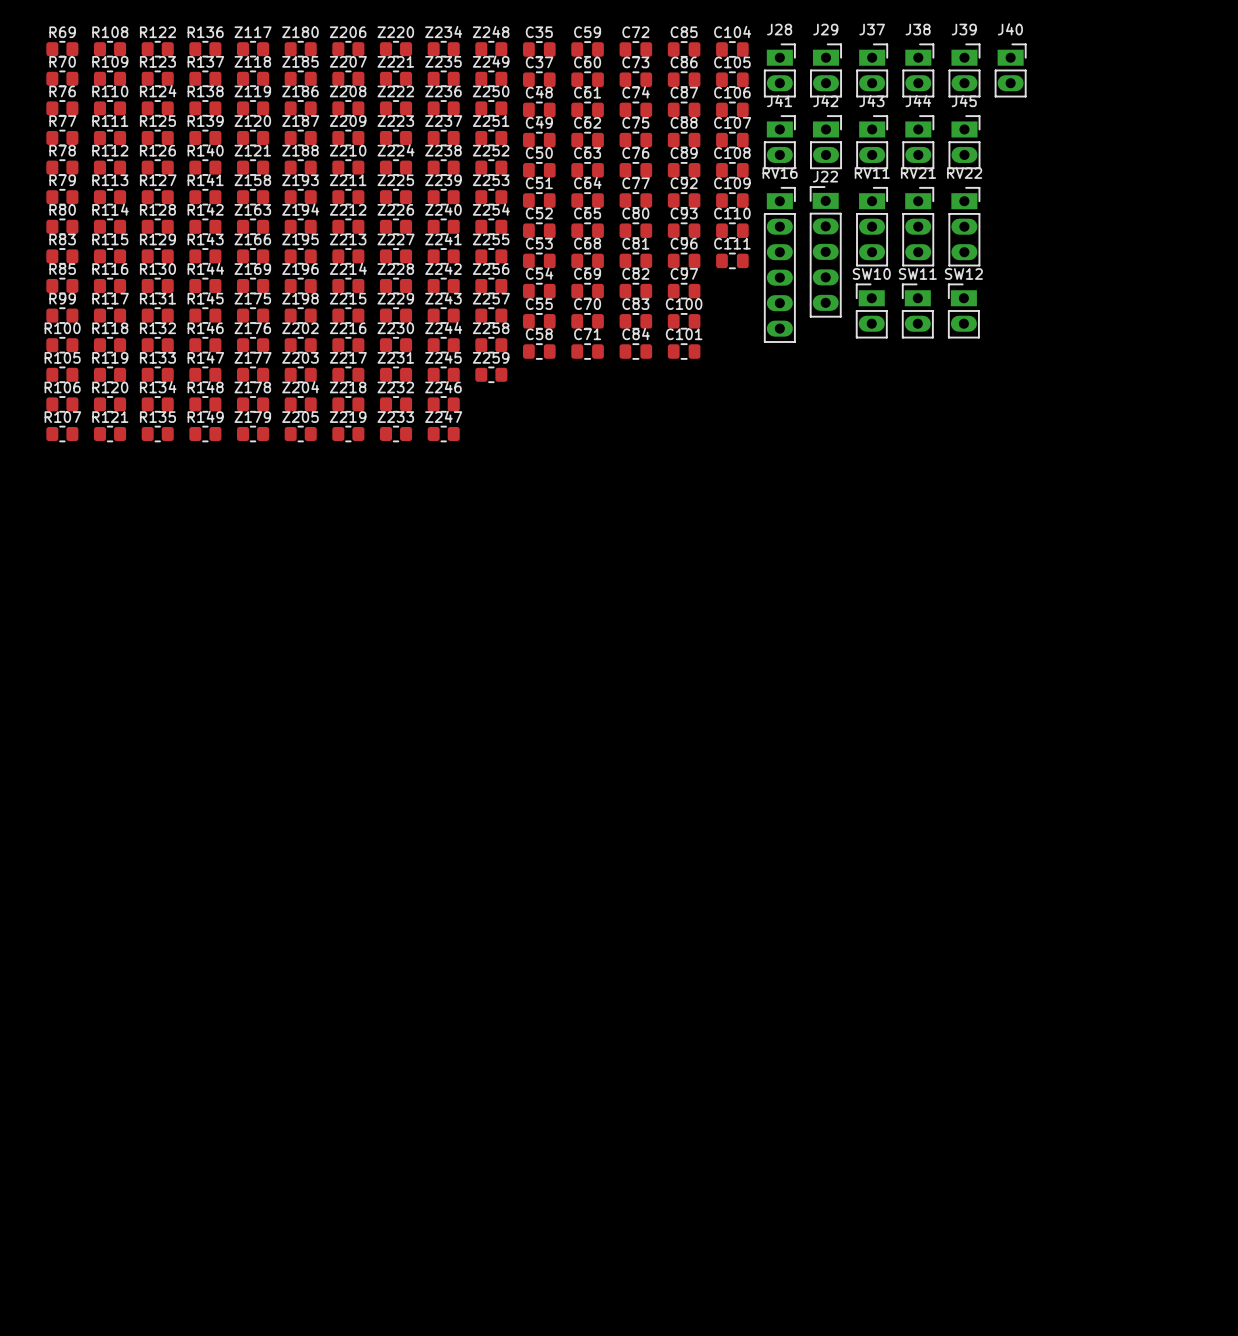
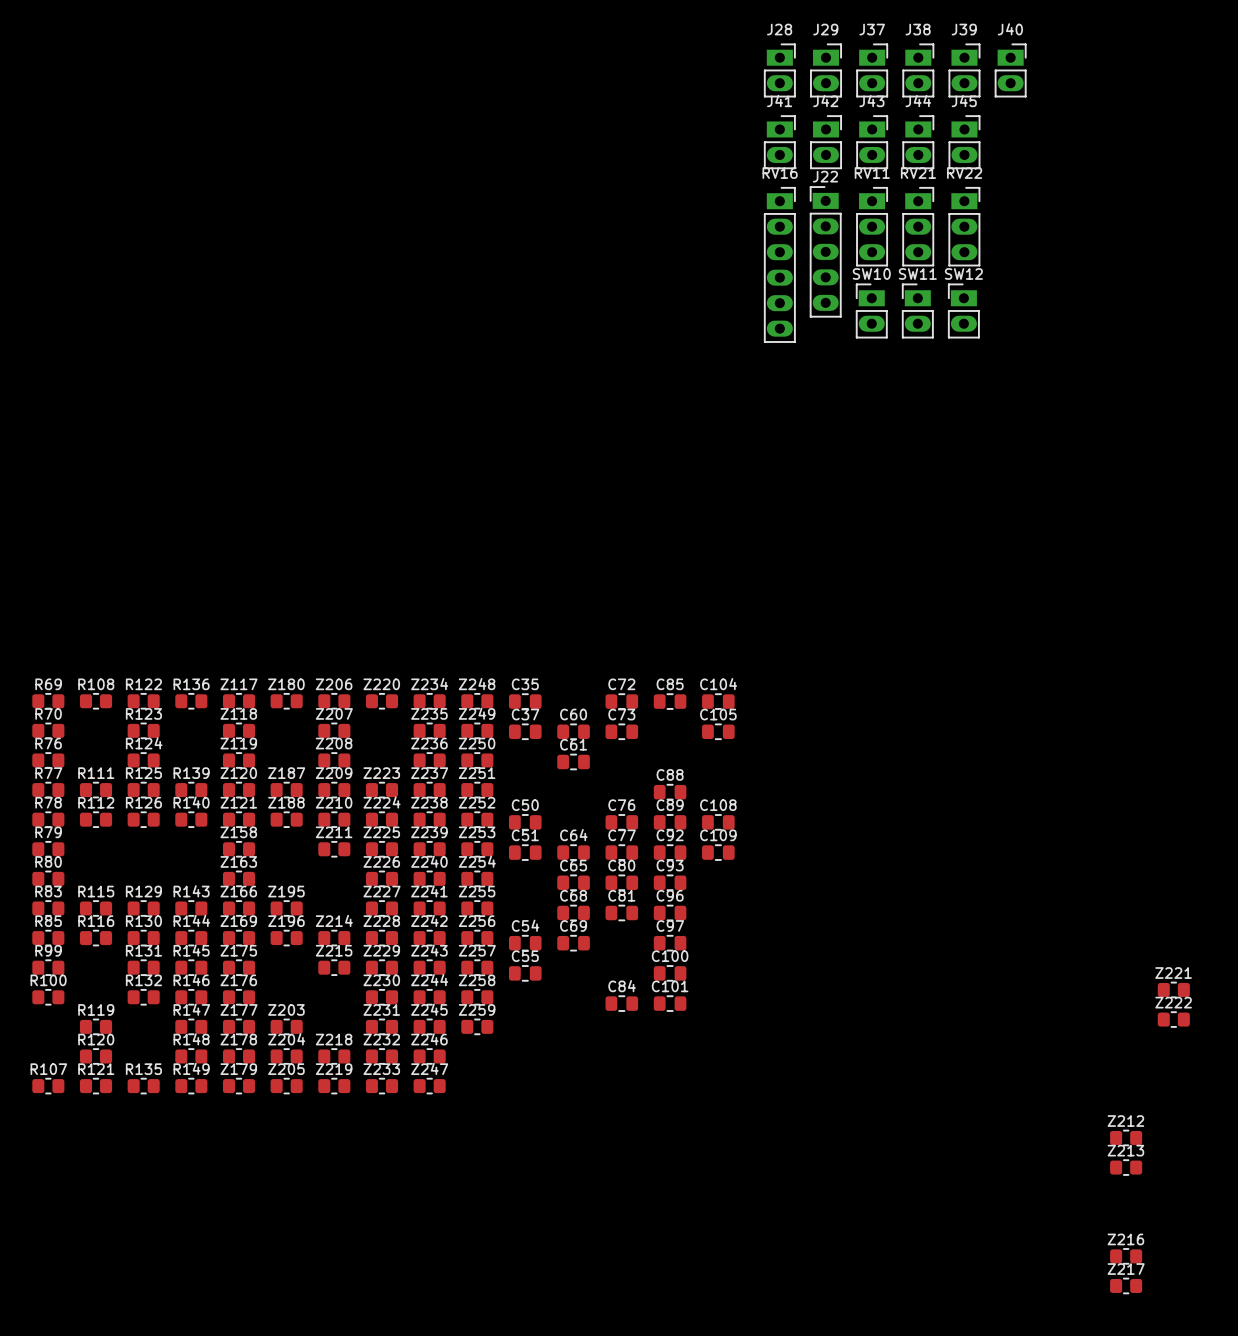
R69 position: (62, 49) -> (48, 701)
R108 position: (110, 49) -> (96, 701)
R122 position: (157, 49) -> (143, 701)
R136 position: (205, 49) -> (191, 701)
Z117 position: (253, 49) -> (239, 701)
Z180 position: (300, 49) -> (286, 701)
Z206 position: (348, 49) -> (334, 701)
Z220 position: (396, 49) -> (381, 701)
Z234 position: (443, 49) -> (429, 701)
Z248 position: (491, 49) -> (477, 701)
C35 position: (539, 49) -> (525, 701)
C59: (587, 49) -> none
C72 position: (635, 49) -> (621, 701)
C85 position: (684, 49) -> (670, 701)
C104 position: (732, 49) -> (718, 701)
R70 position: (62, 78) -> (48, 730)
R109: (110, 78) -> none
R123 position: (157, 78) -> (143, 730)
R137: (205, 78) -> none
Z118 position: (253, 78) -> (239, 730)
Z185: (300, 78) -> none
Z207 position: (348, 78) -> (334, 730)
Z221 position: (396, 78) -> (1173, 989)
Z235 position: (443, 78) -> (429, 730)
Z249 position: (491, 78) -> (477, 730)
C37 position: (539, 79) -> (525, 731)
C60 position: (587, 79) -> (573, 731)
C73 position: (635, 79) -> (621, 731)
C86: (684, 79) -> none
C105 position: (732, 79) -> (718, 731)
R76 position: (62, 108) -> (48, 760)
R110: (110, 108) -> none
R124 position: (157, 108) -> (143, 760)
R138: (205, 108) -> none
Z119 position: (253, 108) -> (239, 760)
Z186: (300, 108) -> none
Z208 position: (348, 108) -> (334, 760)
Z222 position: (396, 108) -> (1173, 1019)
Z236 position: (443, 108) -> (429, 760)
Z250 position: (491, 108) -> (477, 760)
C48: (539, 109) -> none
C61 position: (587, 109) -> (573, 761)
C74: (635, 109) -> none
C87: (684, 109) -> none
C106: (732, 109) -> none
R77 position: (62, 137) -> (48, 790)
R111 position: (110, 137) -> (96, 790)
R125 position: (157, 137) -> (143, 790)
R139 position: (205, 137) -> (191, 790)
Z120 position: (253, 137) -> (239, 790)
Z187 position: (300, 137) -> (286, 790)
Z209 position: (348, 137) -> (334, 790)
Z223 position: (396, 137) -> (381, 790)
Z237 position: (443, 137) -> (429, 790)
Z251 position: (491, 137) -> (477, 790)
C49: (539, 140) -> none
C62: (587, 140) -> none
C75: (635, 140) -> none
C88 position: (684, 140) -> (670, 792)
C107: (732, 140) -> none
R78 position: (62, 167) -> (48, 819)
R112 position: (110, 167) -> (96, 819)
R126 position: (157, 167) -> (143, 819)
R140 position: (205, 167) -> (191, 819)
Z121 position: (253, 167) -> (239, 819)
Z188 position: (300, 167) -> (286, 819)
Z210 position: (348, 167) -> (334, 819)
Z224 position: (396, 167) -> (381, 819)
Z238 position: (443, 167) -> (429, 819)
Z252 position: (491, 167) -> (477, 819)
C50 position: (539, 170) -> (525, 822)
C63: (587, 170) -> none
C76 position: (635, 170) -> (621, 822)
C89 position: (684, 170) -> (670, 822)
C108 position: (732, 170) -> (718, 822)
R79 position: (62, 197) -> (48, 849)
R113: (110, 197) -> none
R127: (157, 197) -> none
R141: (205, 197) -> none
Z158 position: (253, 197) -> (239, 849)
Z193: (300, 197) -> none
Z211 position: (348, 197) -> (334, 849)
Z225 position: (396, 197) -> (381, 849)
Z239 position: (443, 197) -> (429, 849)
Z253 position: (491, 197) -> (477, 849)
C51 position: (539, 200) -> (525, 852)
C64 position: (587, 200) -> (573, 852)
C77 position: (635, 200) -> (621, 852)
C92 position: (684, 200) -> (670, 852)
C109 position: (732, 200) -> (718, 852)
R80 position: (62, 226) -> (48, 878)
R114: (110, 226) -> none
R128: (157, 226) -> none
R142: (205, 226) -> none
Z163 position: (253, 226) -> (239, 878)
Z194: (300, 226) -> none
Z212 position: (348, 226) -> (1126, 1137)
Z226 position: (396, 226) -> (381, 878)
Z240 position: (443, 226) -> (429, 878)
Z254 position: (491, 226) -> (477, 878)
C52: (539, 230) -> none
C65 position: (587, 230) -> (573, 882)
C80 position: (635, 230) -> (621, 882)
C93 position: (684, 230) -> (670, 882)
C110: (732, 230) -> none
R83 position: (62, 256) -> (48, 908)
R115 position: (110, 256) -> (96, 908)
R129 position: (157, 256) -> (143, 908)
R143 position: (205, 256) -> (191, 908)
Z166 position: (253, 256) -> (239, 908)
Z195 position: (300, 256) -> (286, 908)
Z213 position: (348, 256) -> (1126, 1167)
Z227 position: (396, 256) -> (381, 908)
Z241 position: (443, 256) -> (429, 908)
Z255 position: (491, 256) -> (477, 908)
C53: (539, 260) -> none
C68 position: (587, 260) -> (573, 912)
C81 position: (635, 260) -> (621, 912)
C96 position: (684, 260) -> (670, 912)
C111: (732, 260) -> none
R85 position: (62, 286) -> (48, 938)
R116 position: (110, 286) -> (96, 938)
R130 position: (157, 286) -> (143, 938)
R144 position: (205, 286) -> (191, 938)
Z169 position: (253, 286) -> (239, 938)
Z196 position: (300, 286) -> (286, 938)
Z214 position: (348, 286) -> (334, 938)
Z228 position: (396, 286) -> (381, 938)
Z242 position: (443, 286) -> (429, 938)
Z256 position: (491, 286) -> (477, 938)
C54 position: (539, 291) -> (525, 943)
C69 position: (587, 291) -> (573, 943)
C82: (635, 291) -> none
C97 position: (684, 291) -> (670, 943)
R99 position: (62, 315) -> (48, 967)
R117: (110, 315) -> none
R131 position: (157, 315) -> (143, 967)
R145 position: (205, 315) -> (191, 967)
Z175 position: (253, 315) -> (239, 967)
Z198: (300, 315) -> none
Z215 position: (348, 315) -> (334, 967)
Z229 position: (396, 315) -> (381, 967)
Z243 position: (443, 315) -> (429, 967)
Z257 position: (491, 315) -> (477, 967)
C55 position: (539, 321) -> (525, 973)
C70: (587, 321) -> none
C83: (635, 321) -> none
C100 position: (684, 321) -> (670, 973)
R100 position: (62, 345) -> (48, 997)
R118: (110, 345) -> none
R132 position: (157, 345) -> (143, 997)
R146 position: (205, 345) -> (191, 997)
Z176 position: (253, 345) -> (239, 997)
Z202: (300, 345) -> none
Z216 position: (348, 345) -> (1126, 1256)
Z230 position: (396, 345) -> (381, 997)
Z244 position: (443, 345) -> (429, 997)
Z258 position: (491, 345) -> (477, 997)
C58: (539, 351) -> none
C71: (587, 351) -> none
C84 position: (635, 351) -> (621, 1003)
C101 position: (684, 351) -> (670, 1003)
R105: (62, 374) -> none
R119 position: (110, 374) -> (96, 1026)
R133: (157, 374) -> none
R147 position: (205, 374) -> (191, 1026)
Z177 position: (253, 374) -> (239, 1026)
Z203 position: (300, 374) -> (286, 1026)
Z217 position: (348, 374) -> (1126, 1285)
Z231 position: (396, 374) -> (381, 1026)
Z245 position: (443, 374) -> (429, 1026)
Z259 position: (491, 374) -> (477, 1026)
R106: (62, 404) -> none
R120 position: (110, 404) -> (96, 1056)
R134: (157, 404) -> none
R148 position: (205, 404) -> (191, 1056)
Z178 position: (253, 404) -> (239, 1056)
Z204 position: (300, 404) -> (286, 1056)
Z218 position: (348, 404) -> (334, 1056)
Z232 position: (396, 404) -> (381, 1056)
Z246 position: (443, 404) -> (429, 1056)
R107 position: (62, 434) -> (48, 1086)
R121 position: (110, 434) -> (96, 1086)
R135 position: (157, 434) -> (143, 1086)
R149 position: (205, 434) -> (191, 1086)
Z179 position: (253, 434) -> (239, 1086)
Z205 position: (300, 434) -> (286, 1086)
Z219 position: (348, 434) -> (334, 1086)
Z233 position: (396, 434) -> (381, 1086)
Z247 position: (443, 434) -> (429, 1086)

